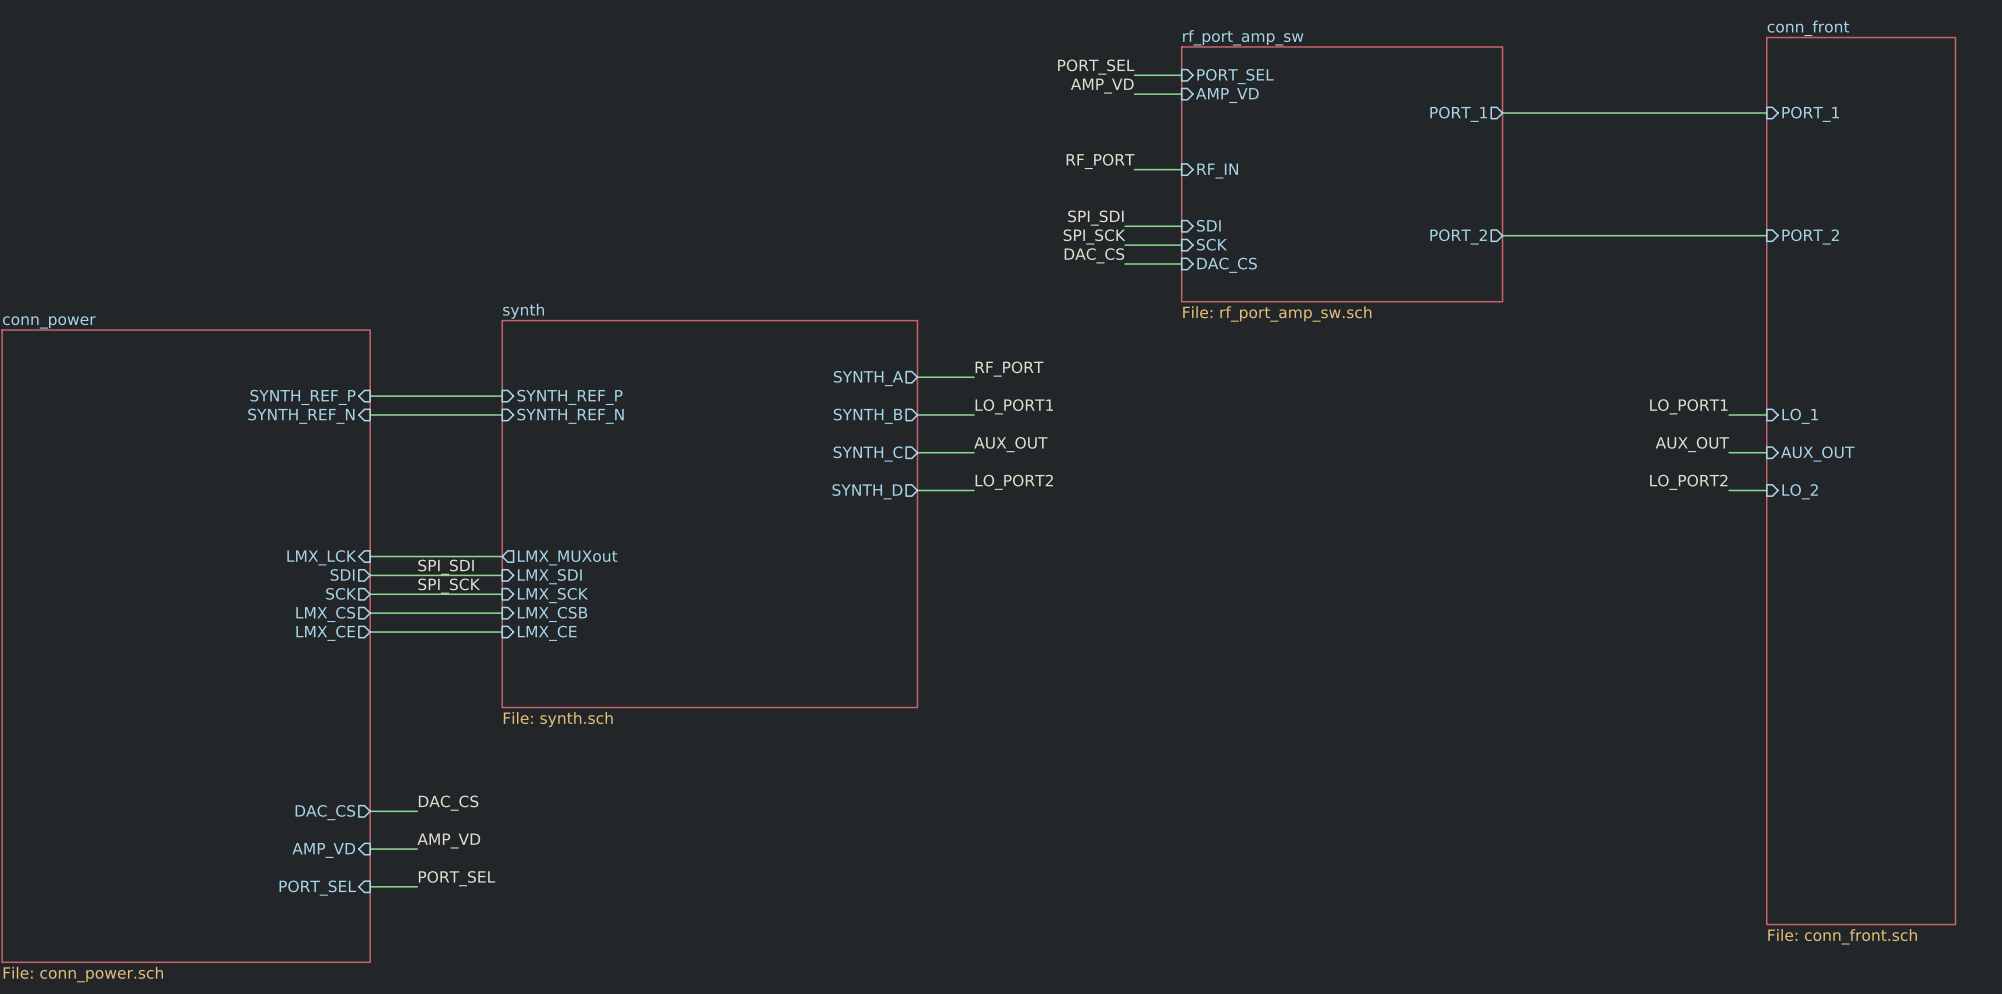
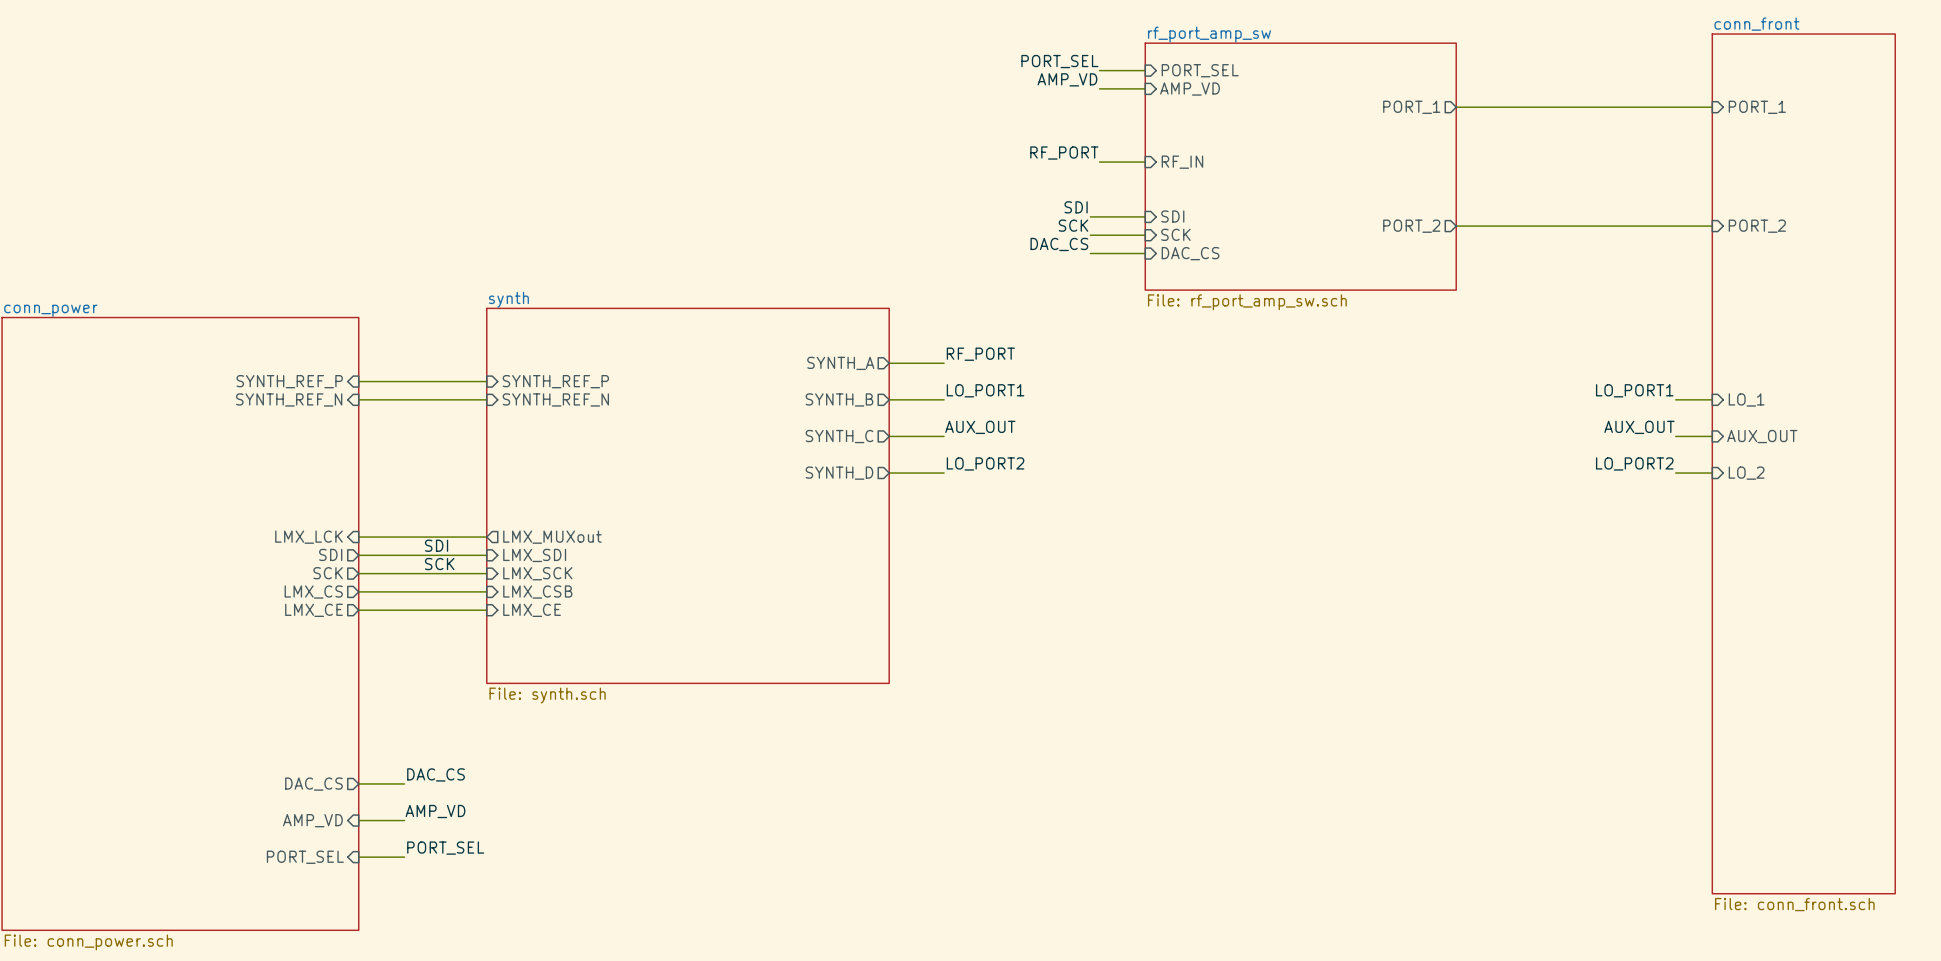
label: SPI_SDI (1095, 218) -> SDI (1076, 207)
label: SPI_SCK (1094, 236) -> SCK (1073, 225)
label: none -> SDI (436, 545)
label: SPI_SDI (446, 567) -> none
label: none -> SCK (439, 564)
label: SPI_SCK (449, 586) -> none

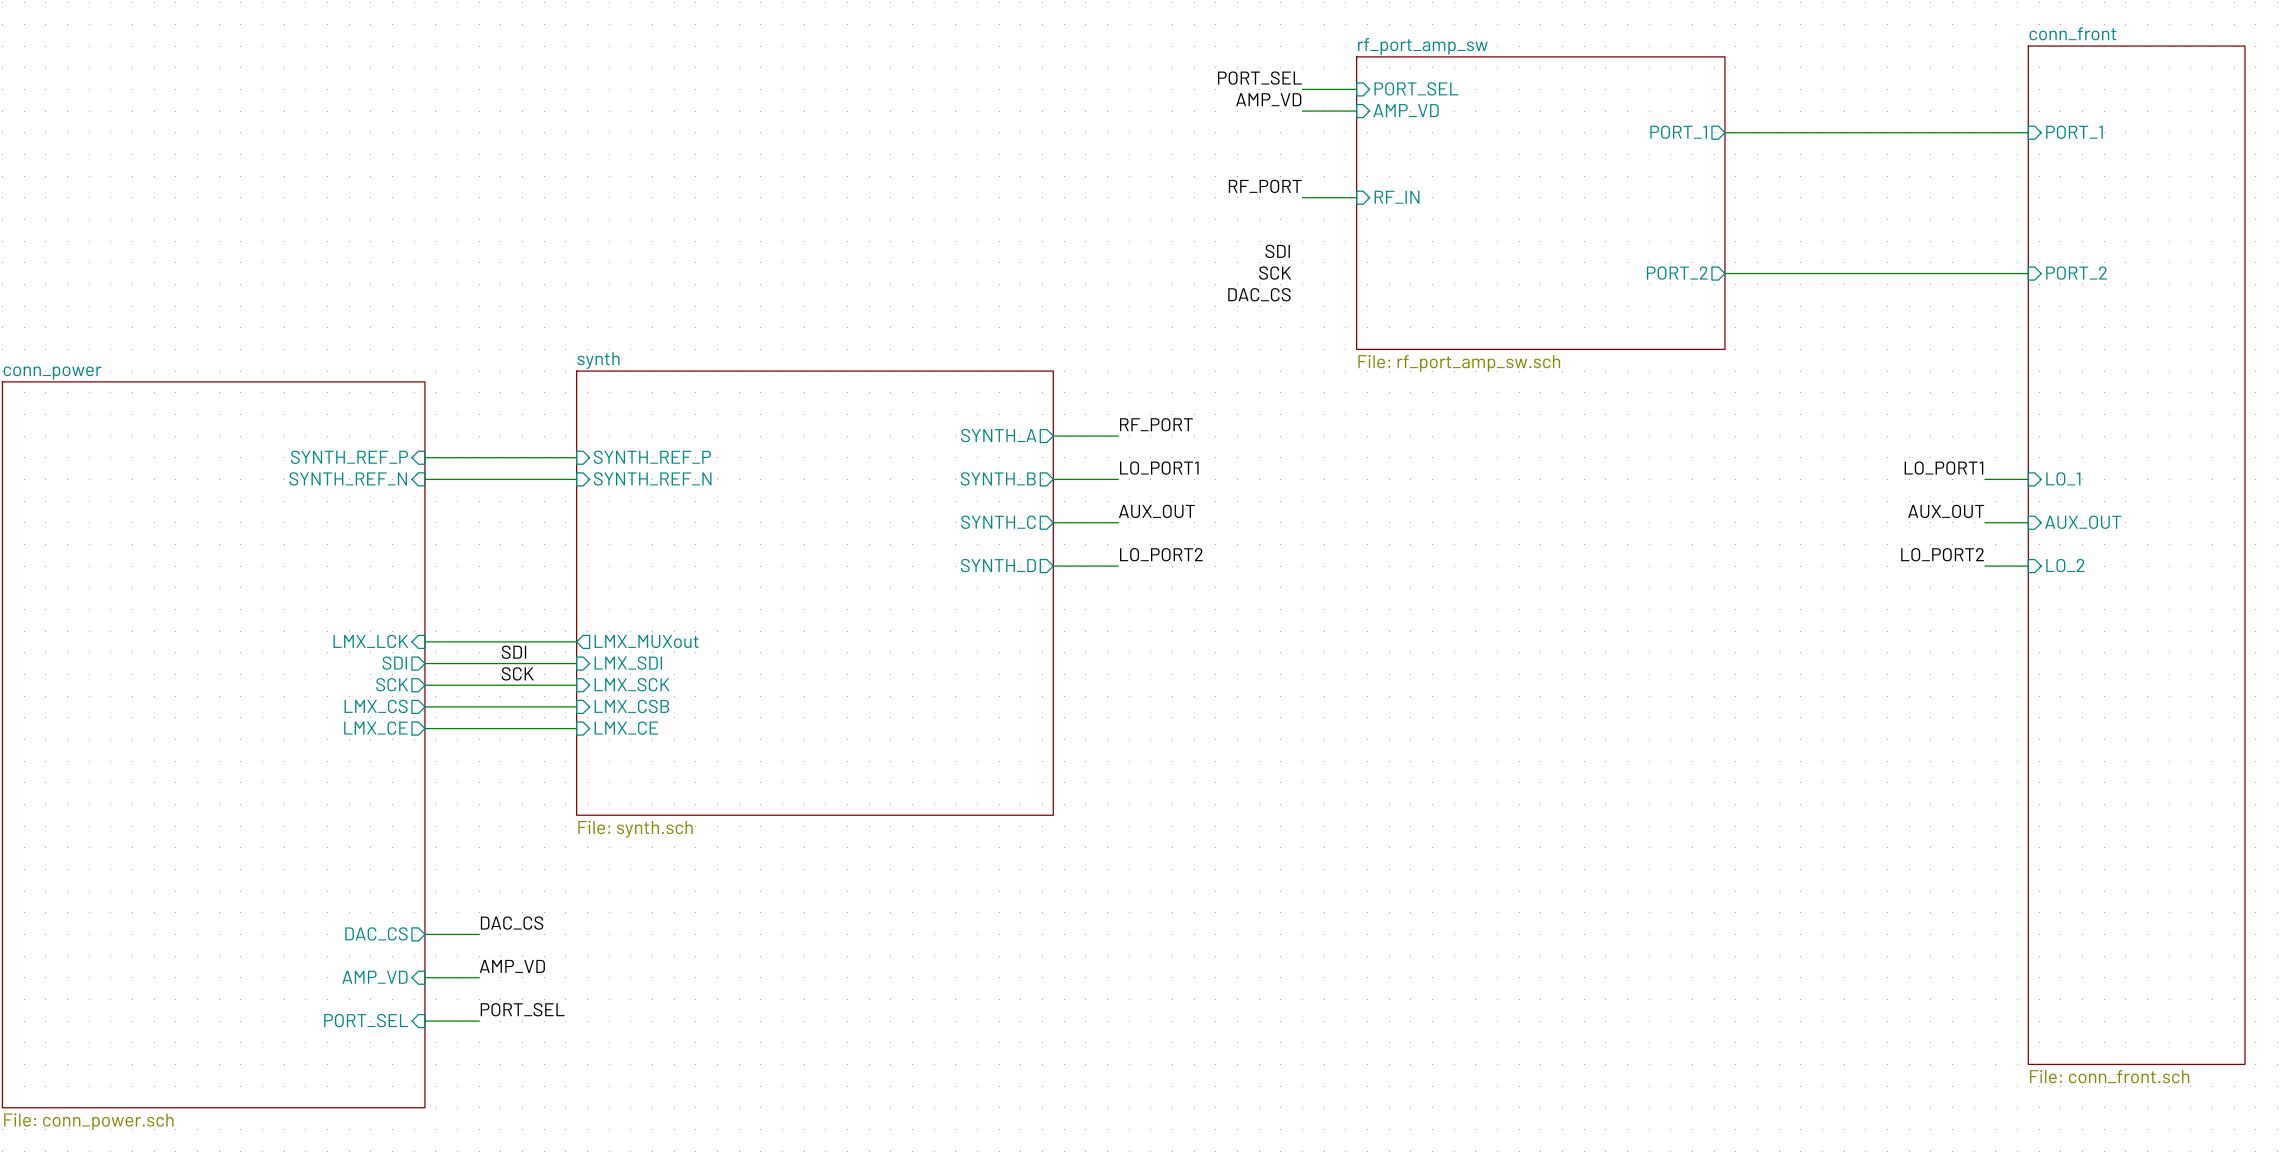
wire: (1090, 216) (1145, 216) -> none
sheet pin: SDI (1172, 216) -> none
sheet pin: SCK (1175, 234) -> none
wire: (1090, 235) (1145, 235) -> none
wire: (1090, 253) (1145, 253) -> none
sheet pin: DAC_CS (1190, 253) -> none

